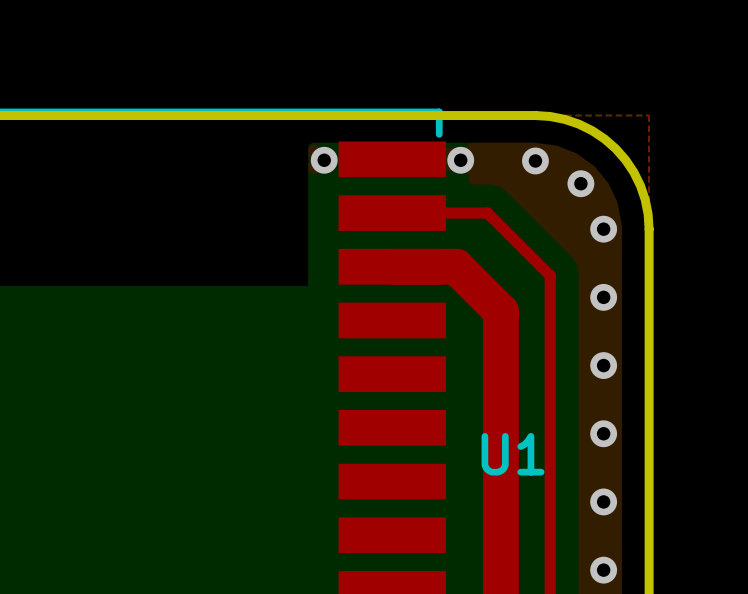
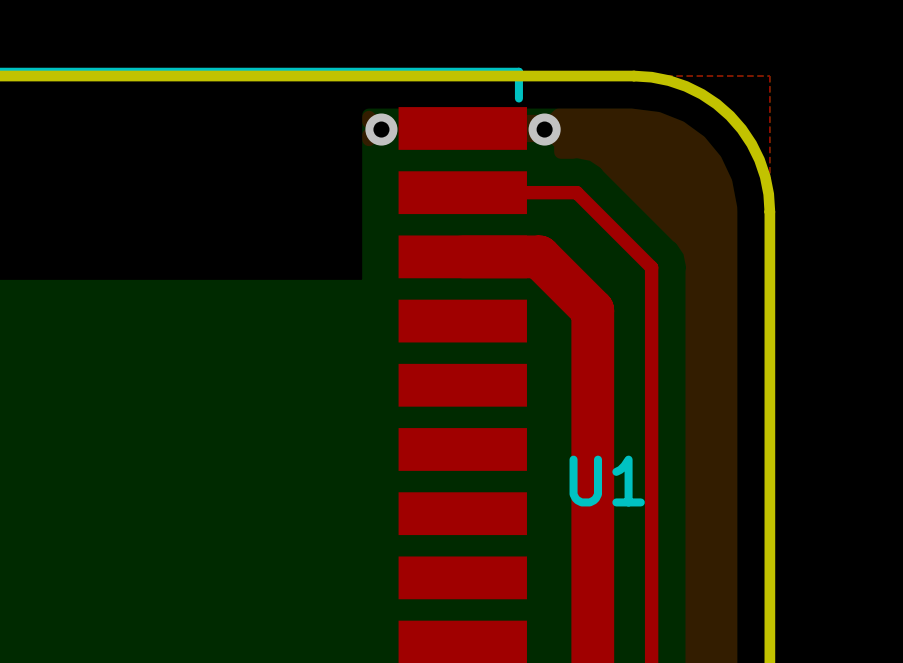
via: (535, 160) -> none
via: (580, 183) -> none
via: (603, 229) -> none
via: (603, 297) -> none
via: (603, 365) -> none
via: (603, 433) -> none
via: (603, 501) -> none
via: (603, 570) -> none

